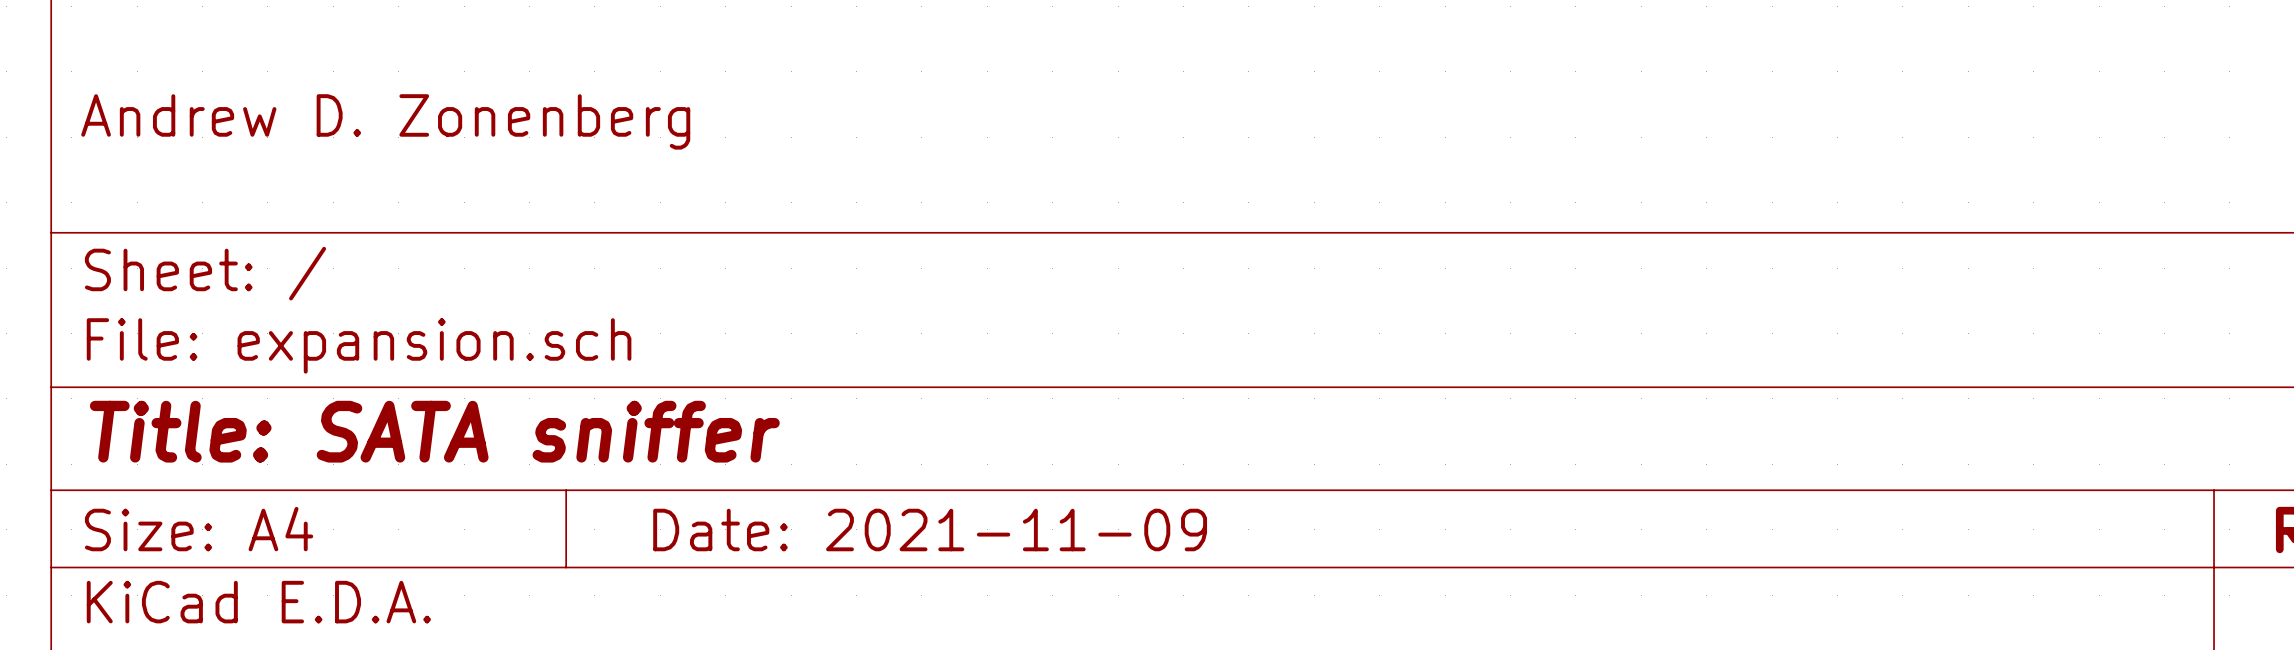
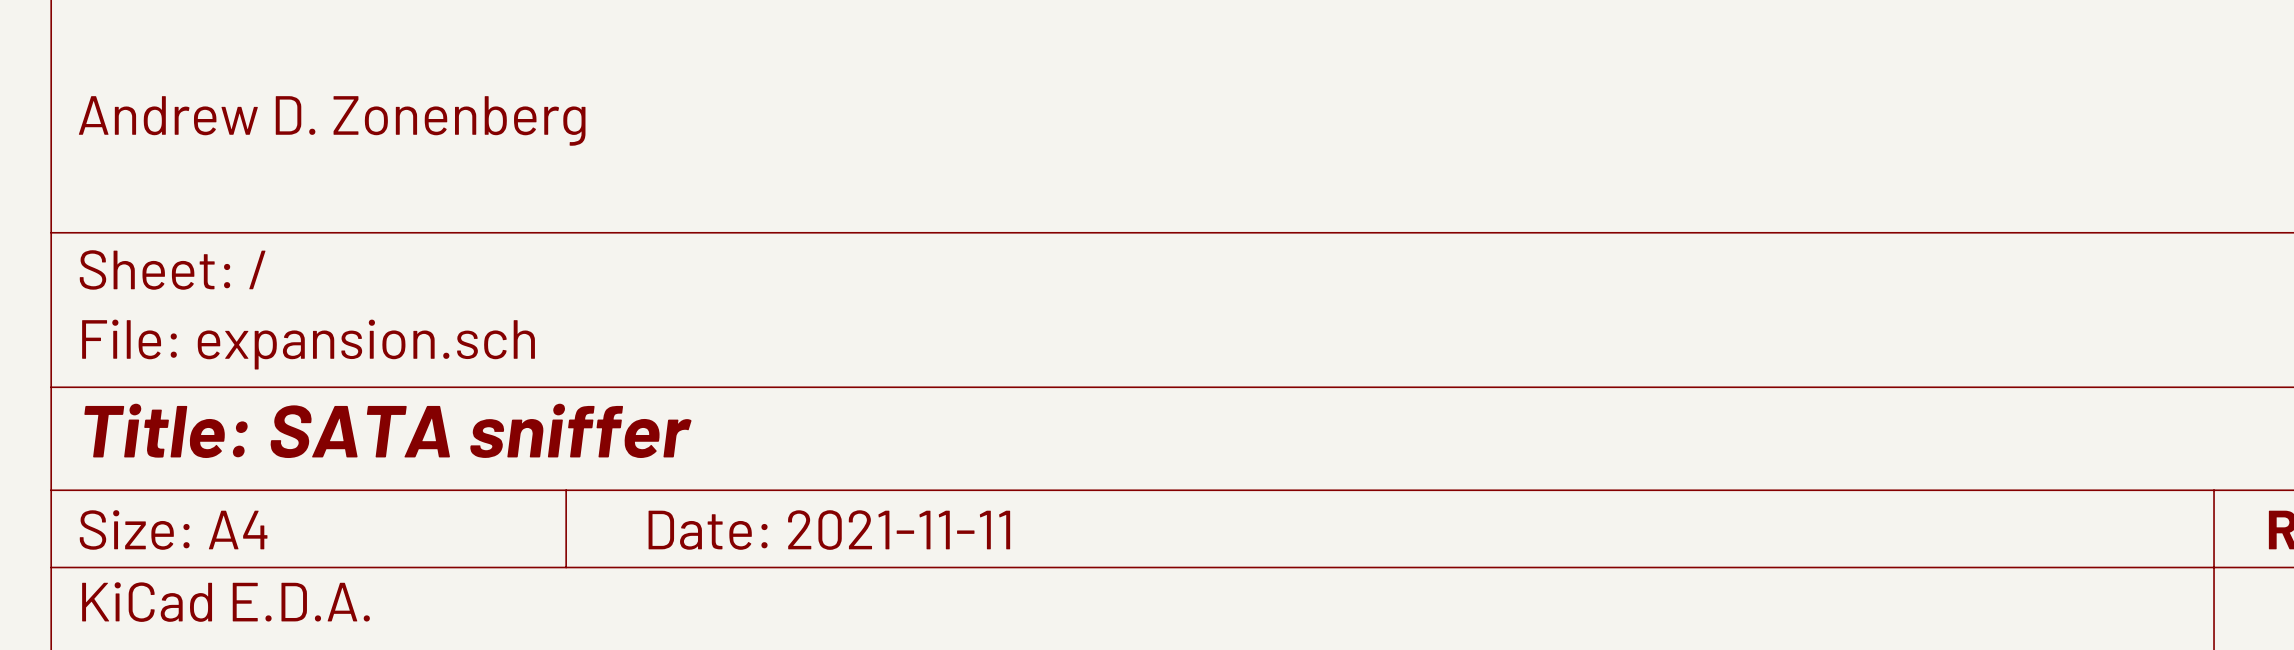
title block: Date: 2021-11-09 (930, 530) -> Date: 2021-11-11 (829, 530)

